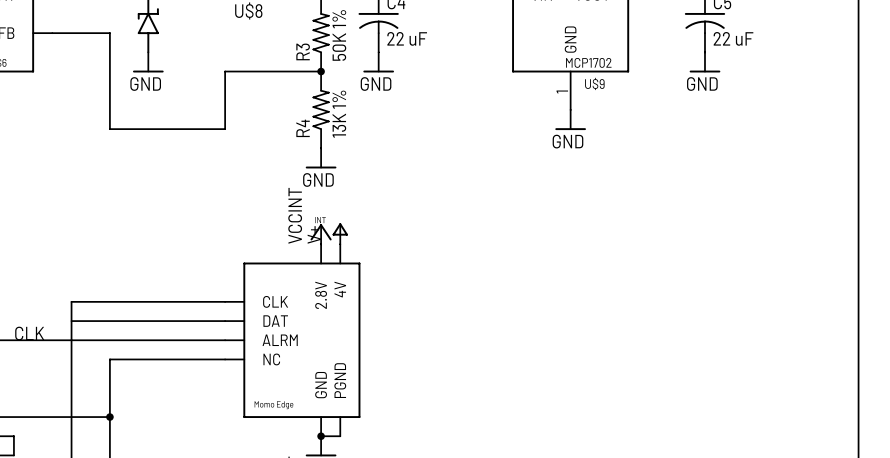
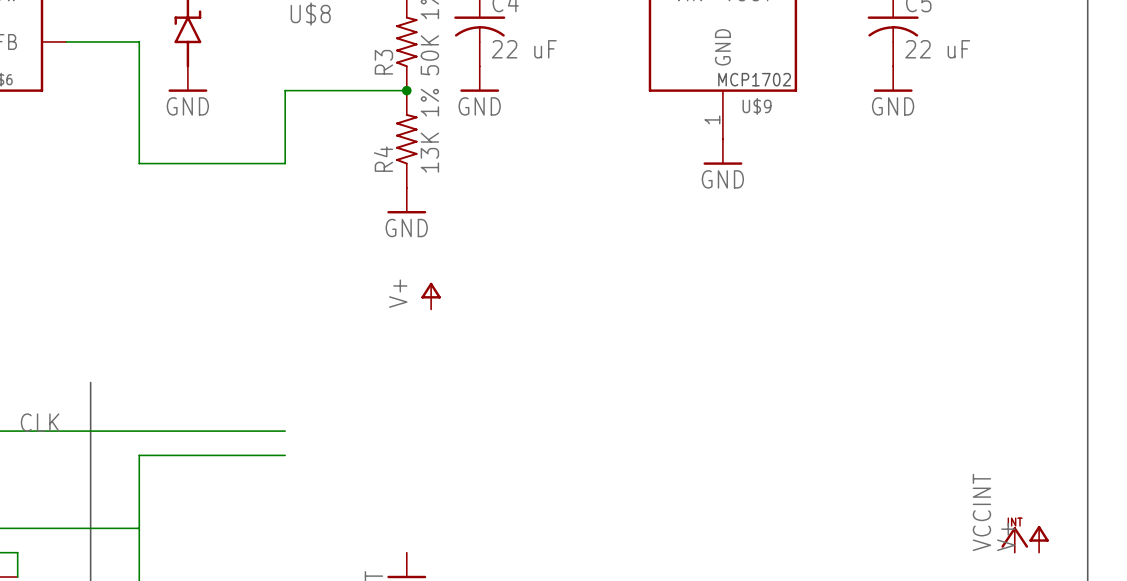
power symbol: VCCINT (321, 234) -> none
wire: (71, 301) (225, 301) -> none
wire: (71, 321) (225, 321) -> none
part: (292, 340) -> none
junction: (109, 417) -> none
power symbol: none -> V+ (1039, 539)
power symbol: none -> VCCINT (1014, 539)
wire: (321, 436) (340, 436) -> none
junction: (321, 436) -> none

